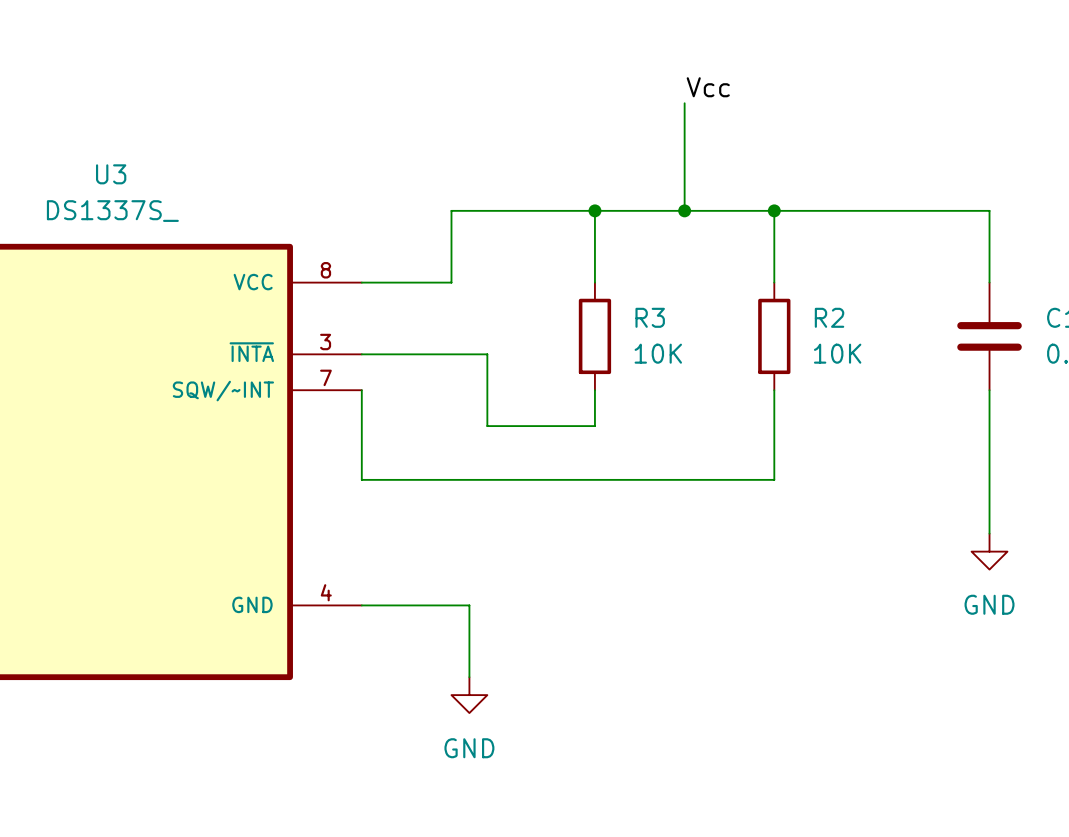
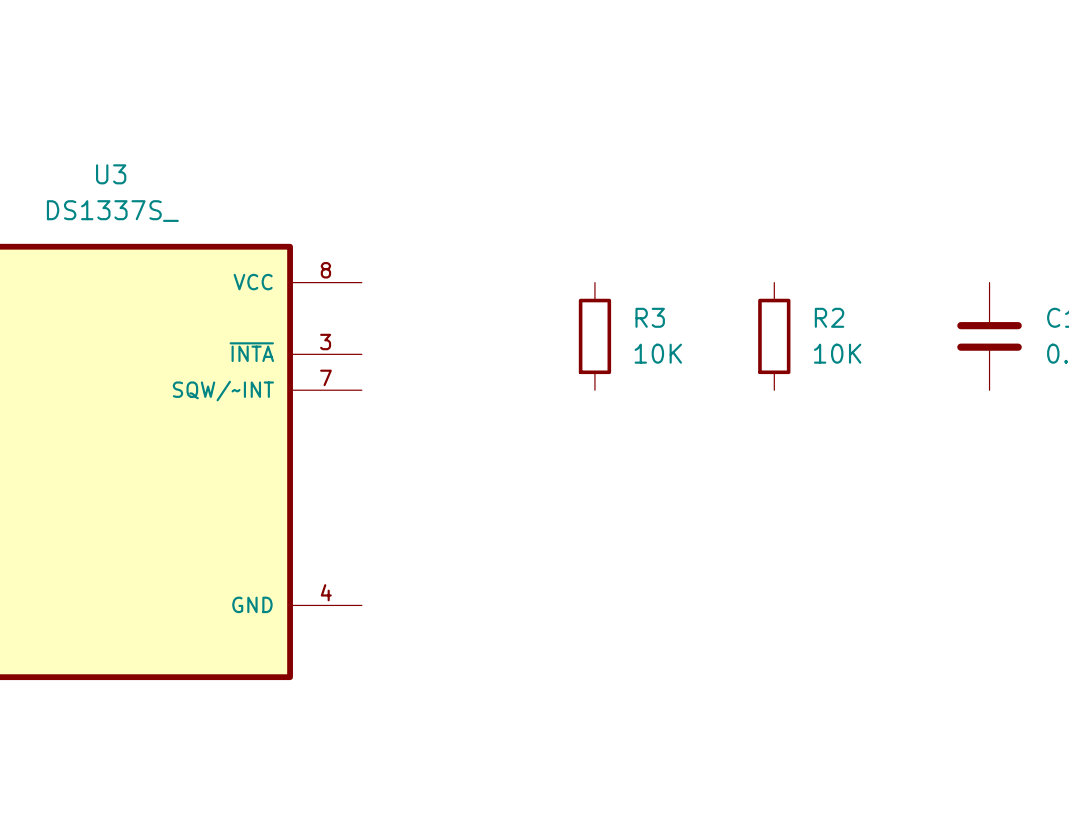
label: Vcc (708, 87) -> none
wire: (684, 103) (684, 210) -> none
wire: (594, 210) (594, 282) -> none
junction: (594, 210) -> none
junction: (684, 210) -> none
wire: (774, 210) (774, 282) -> none
junction: (774, 210) -> none
wire: (361, 282) (451, 282) (451, 210) (989, 210) (989, 282) -> none
wire: (361, 354) (487, 354) (487, 426) (594, 426) (594, 390) -> none
wire: (361, 390) (361, 479) (774, 479) (774, 390) -> none
wire: (989, 390) (989, 533) -> none
power symbol: GND (989, 551) -> none
wire: (361, 605) (469, 605) (469, 677) -> none
power symbol: GND (469, 695) -> none

